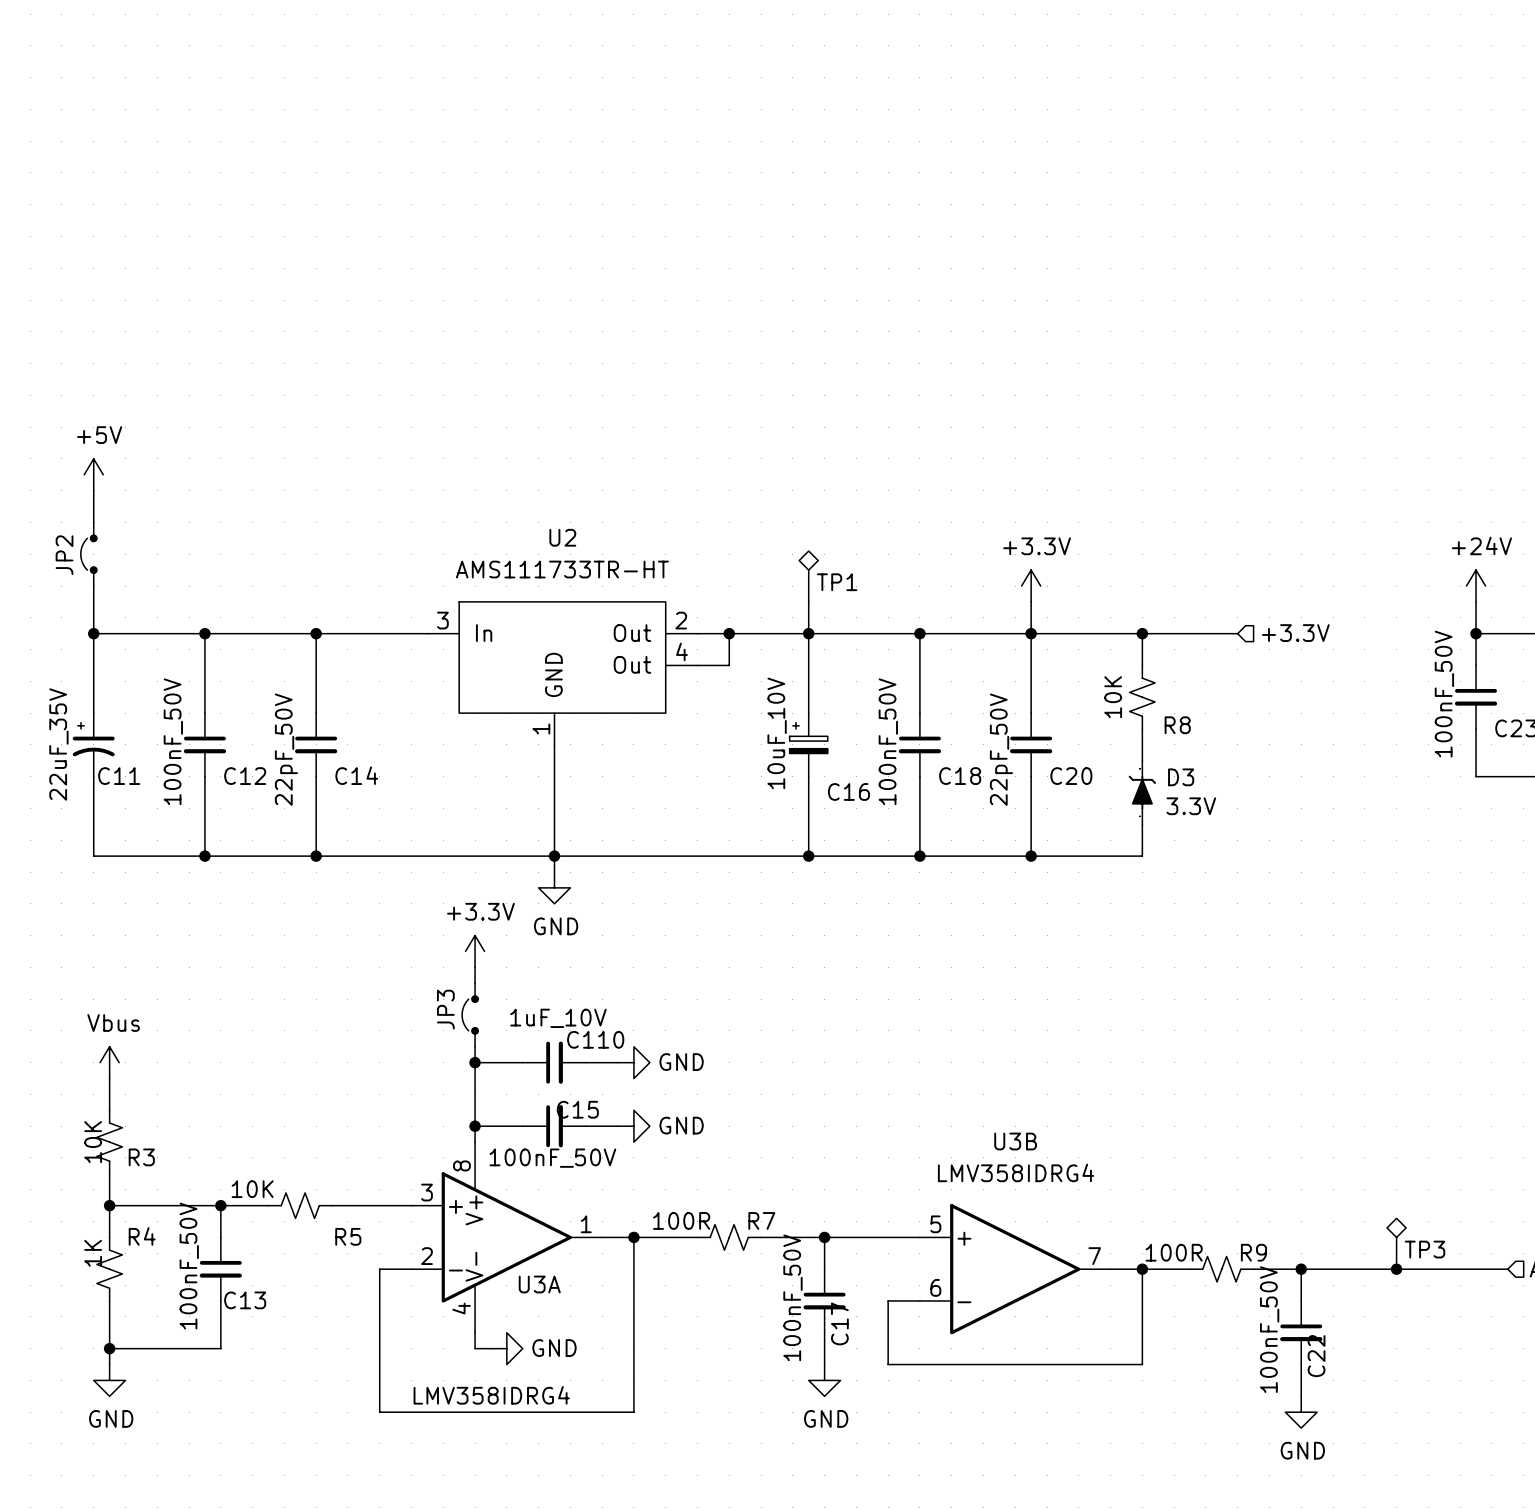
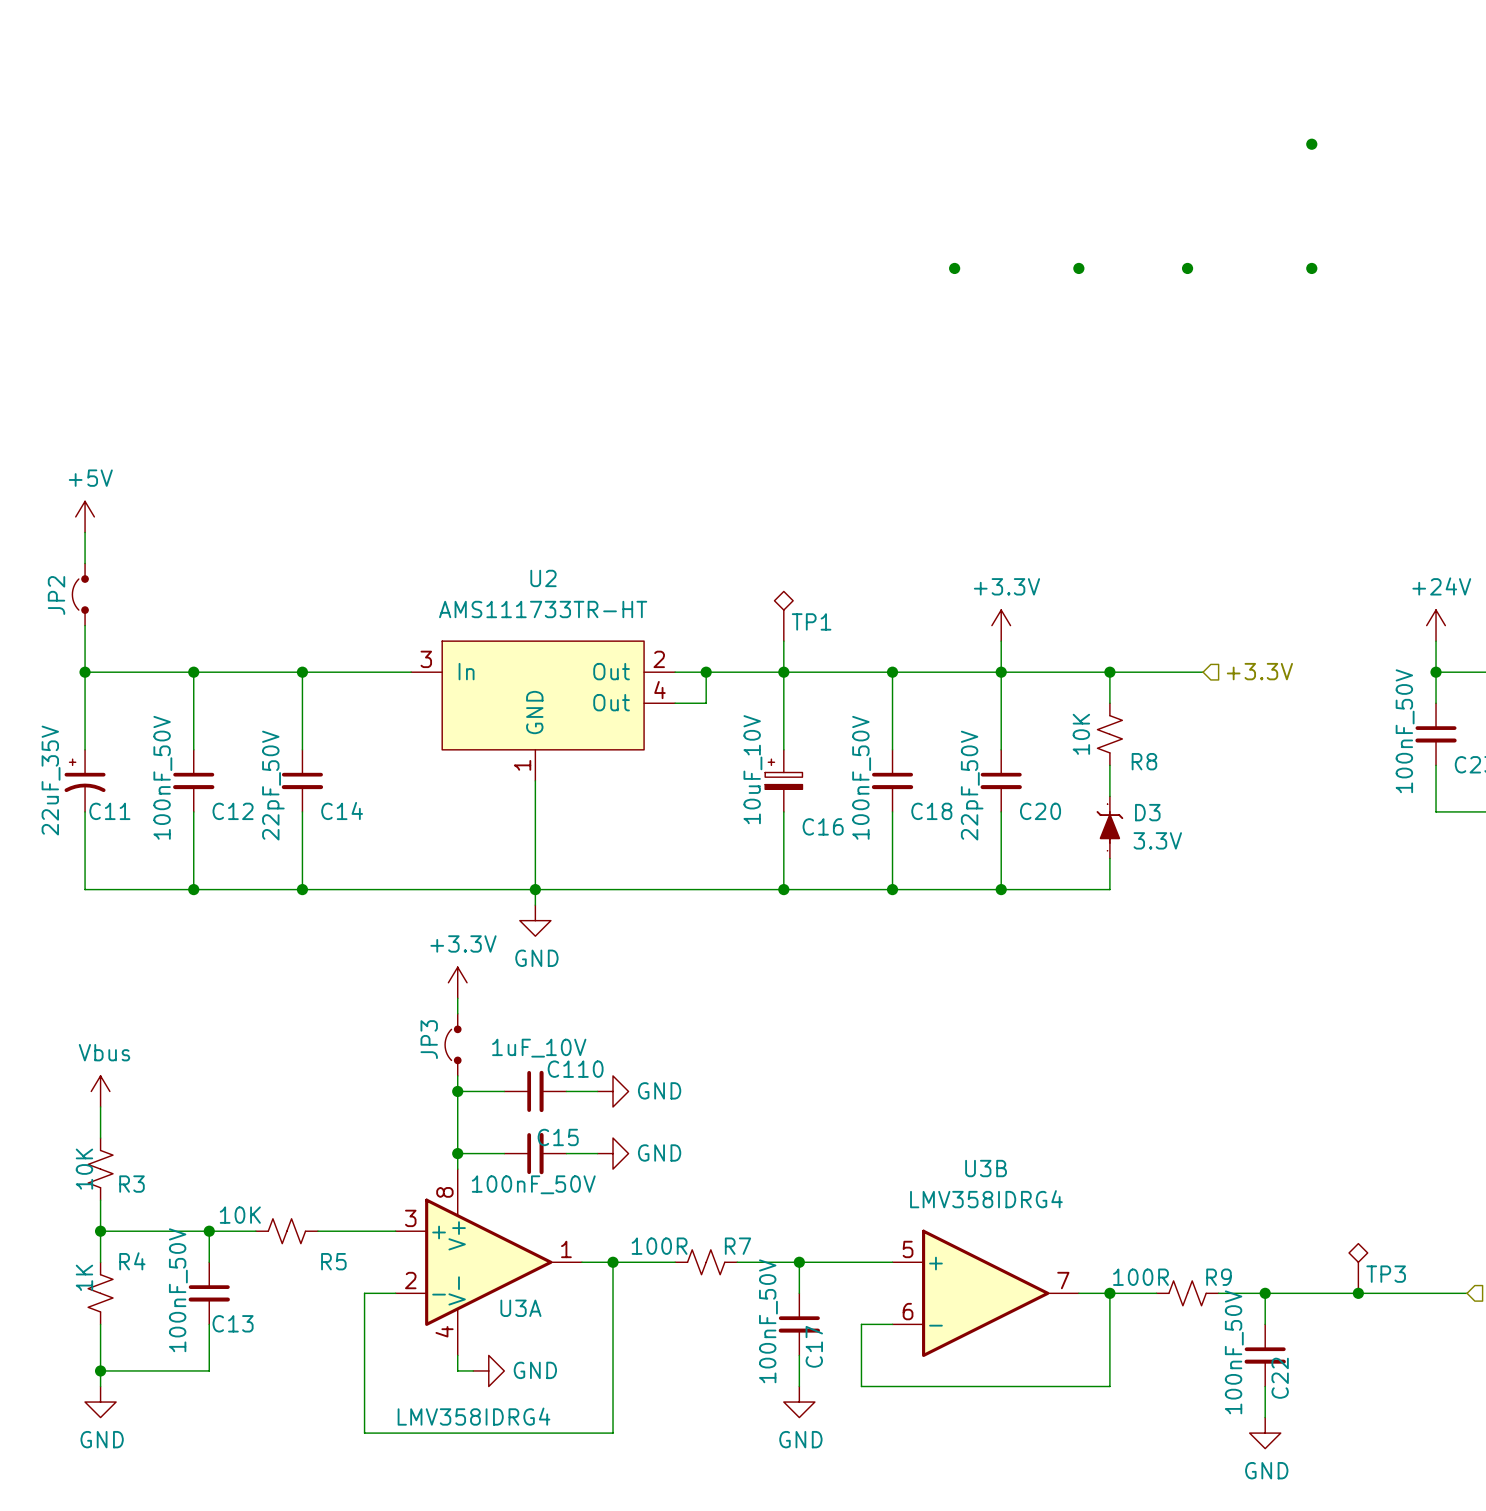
junction: none -> (1311, 144)
junction: none -> (954, 268)
junction: none -> (1078, 268)
junction: none -> (1187, 268)
junction: none -> (1311, 268)

